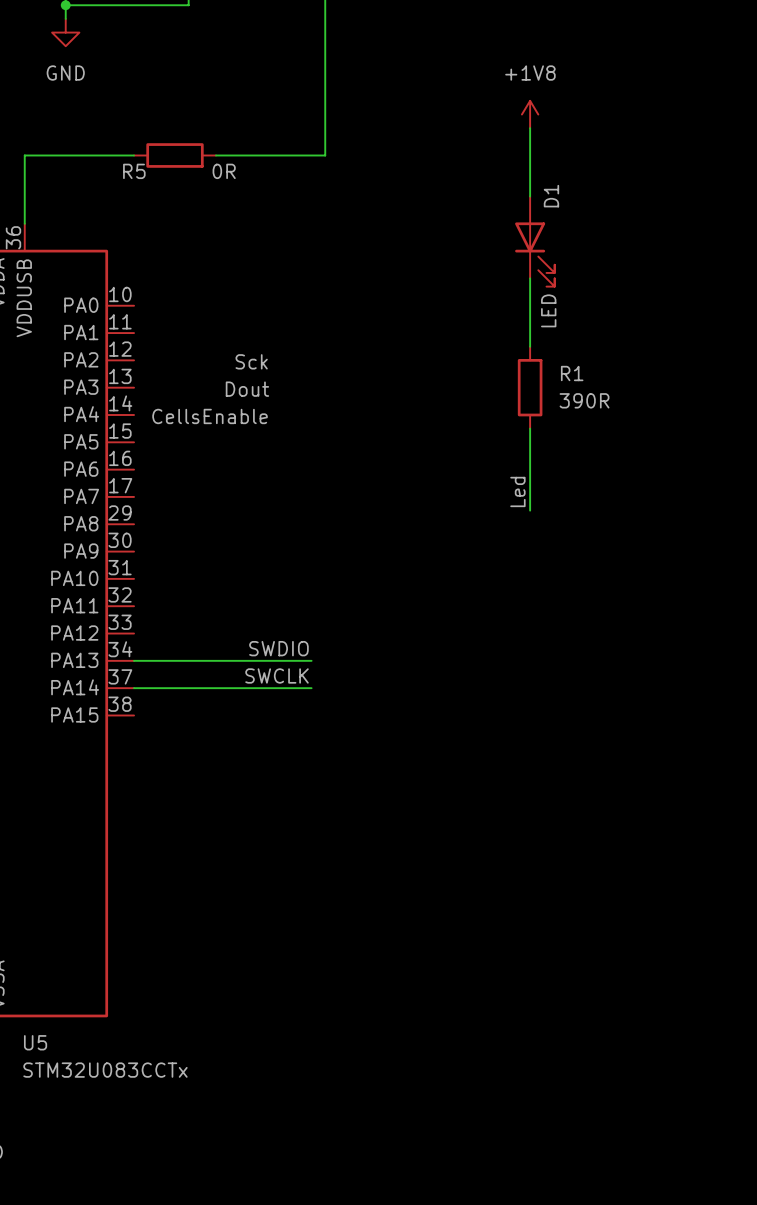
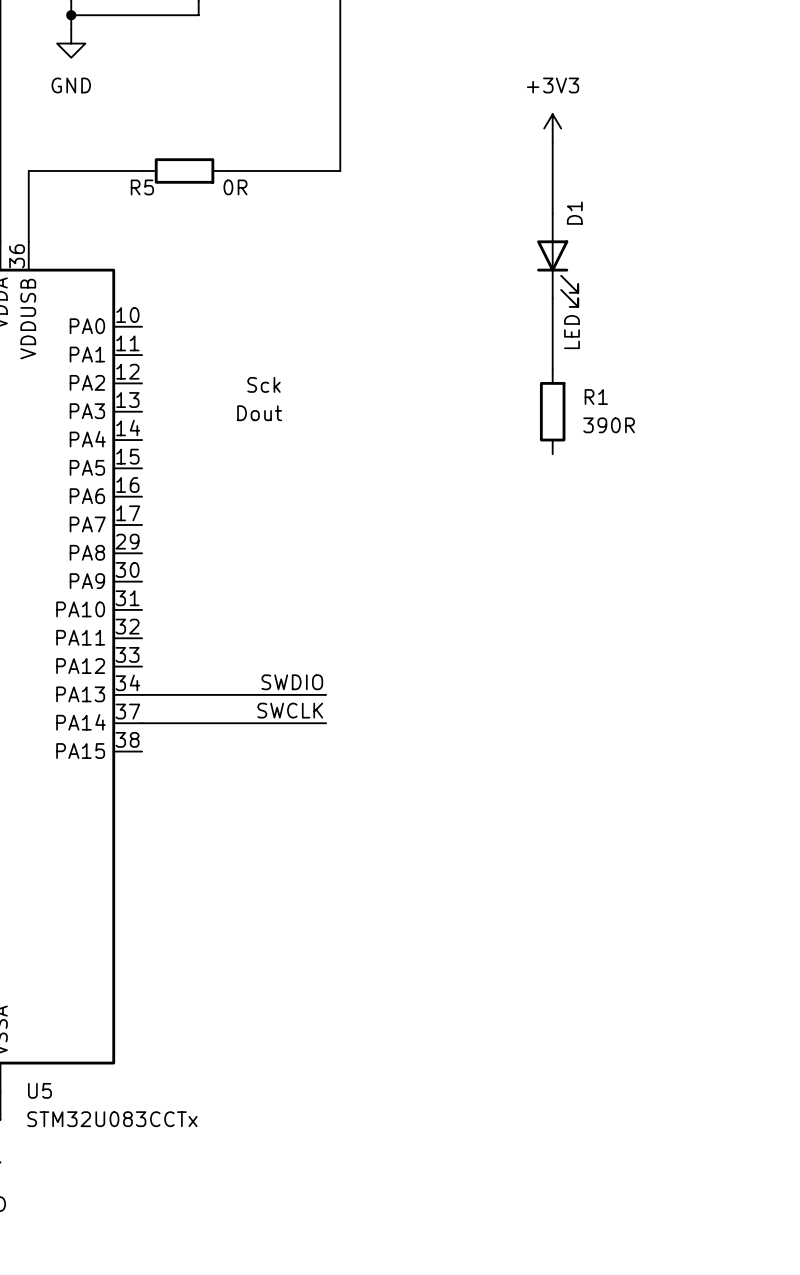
power symbol: +1V8 (530, 114) -> +3V3 (552, 128)
label: CellsEnable (210, 416) -> none
wire: (530, 428) (530, 510) -> none
label: Led (517, 491) -> none

